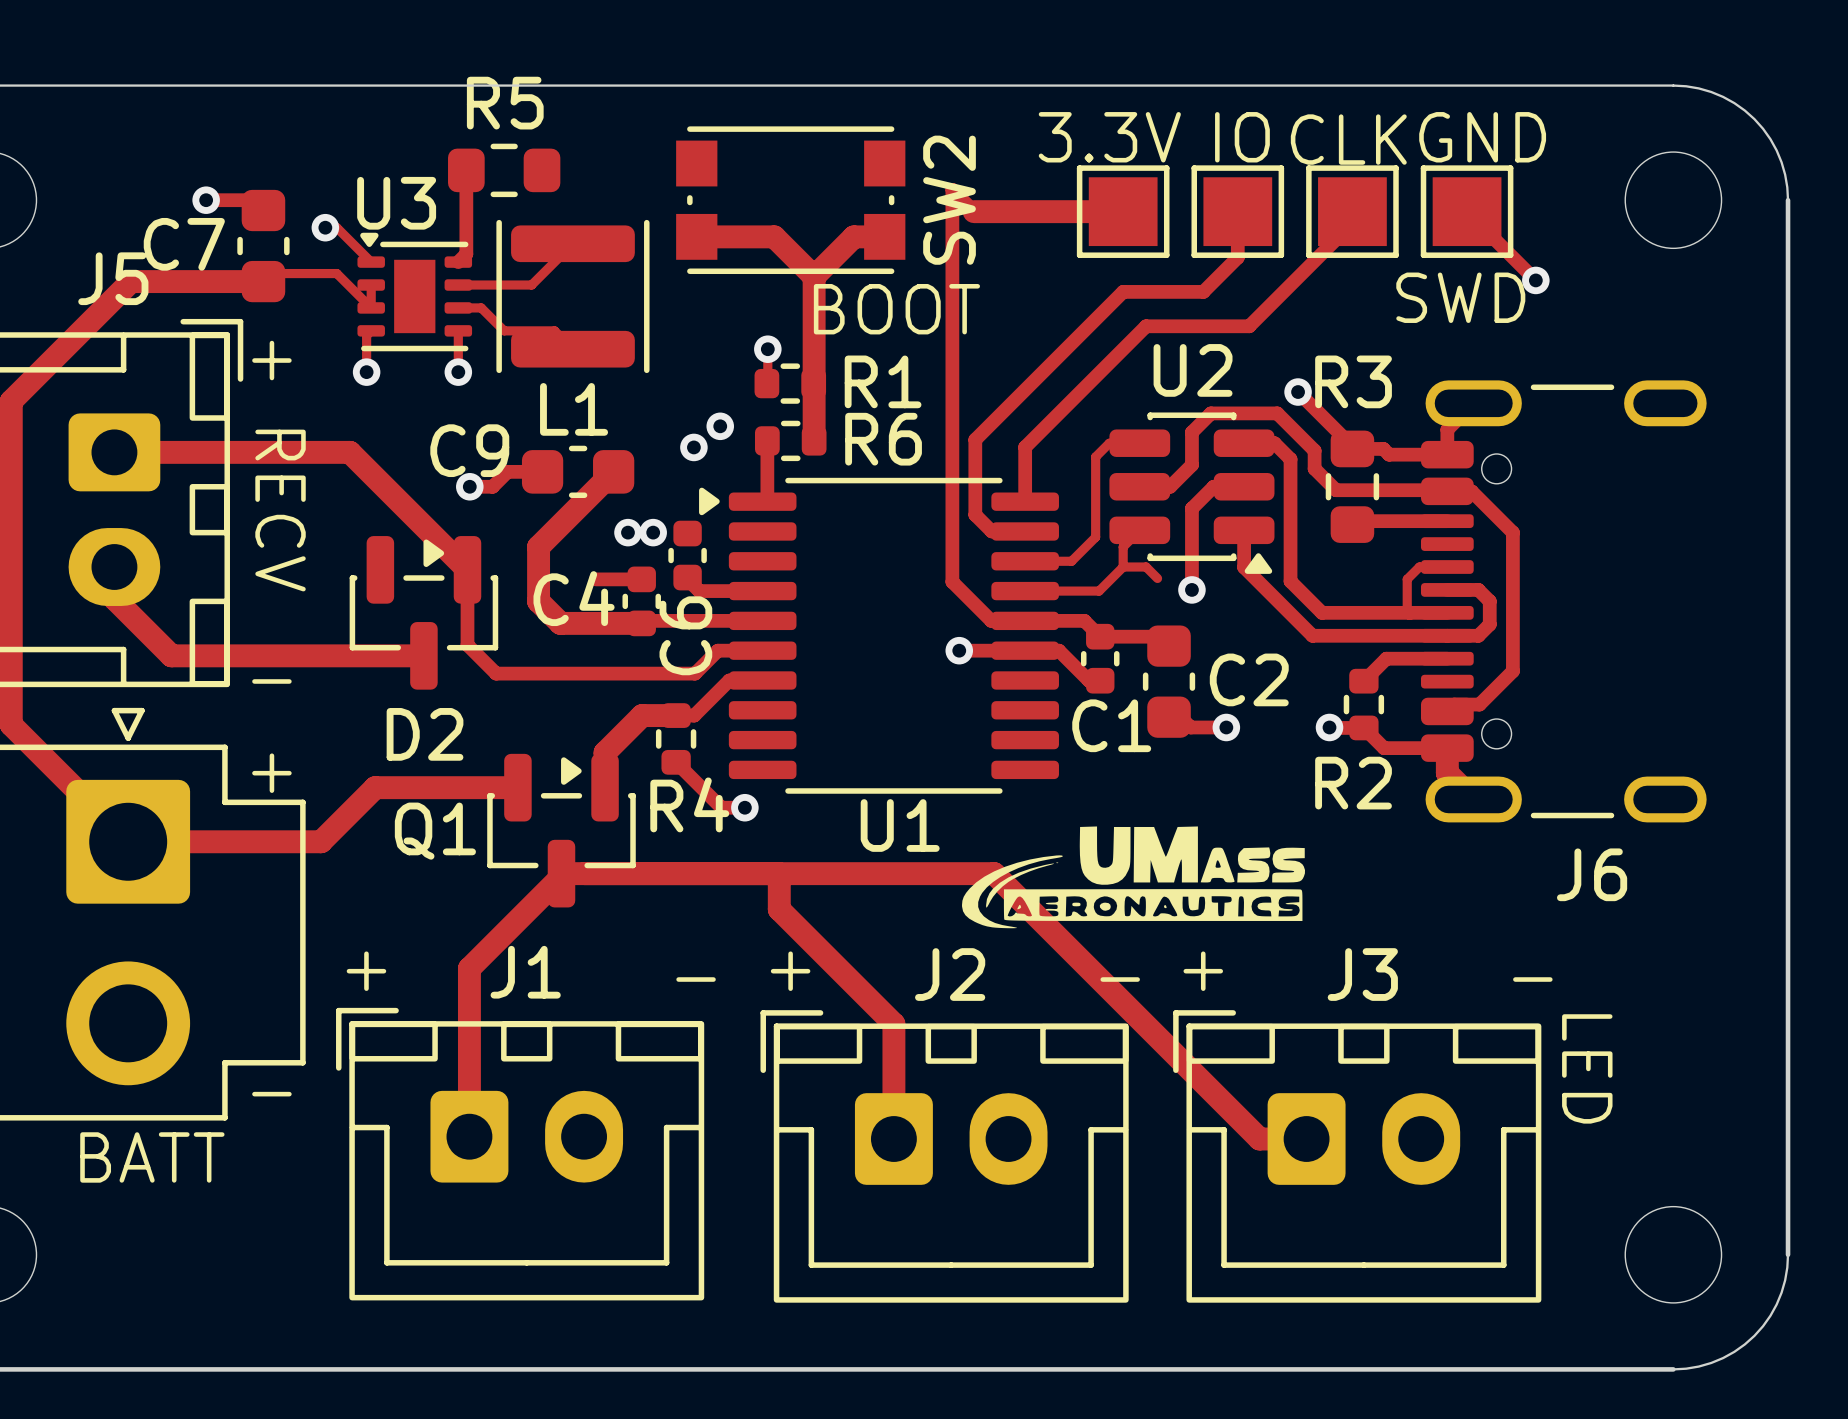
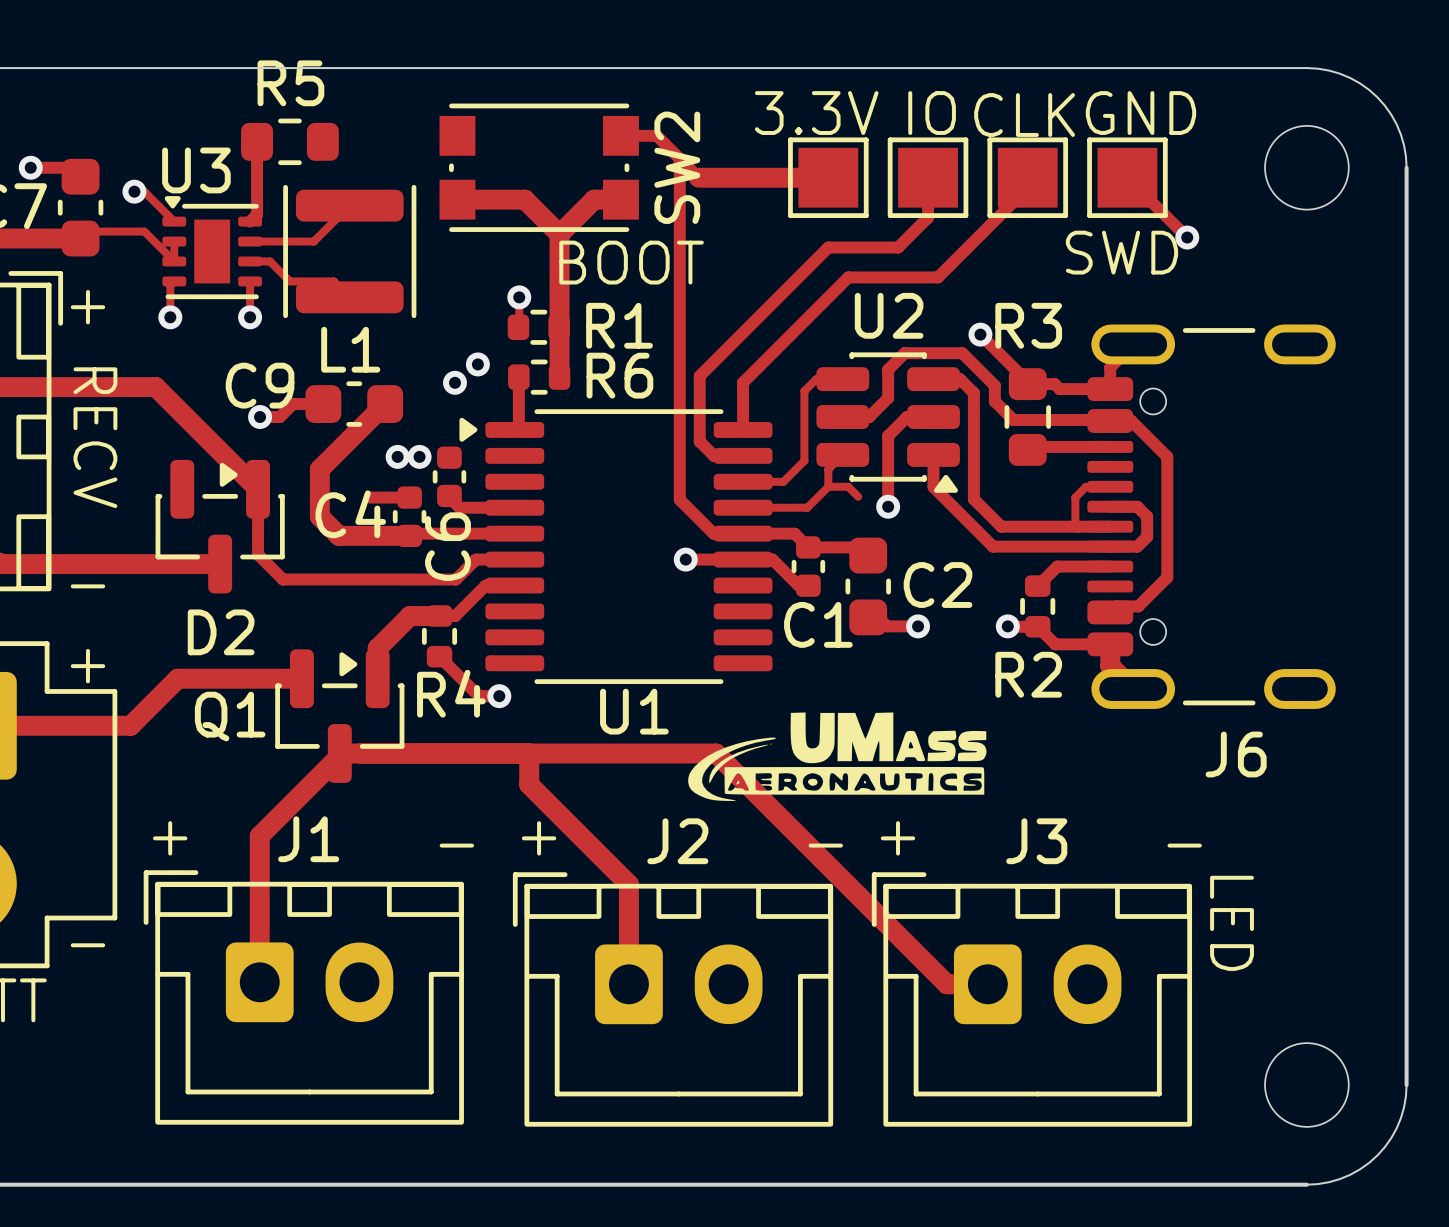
track: none -> (620, 135) (656, 135) (679, 158)

